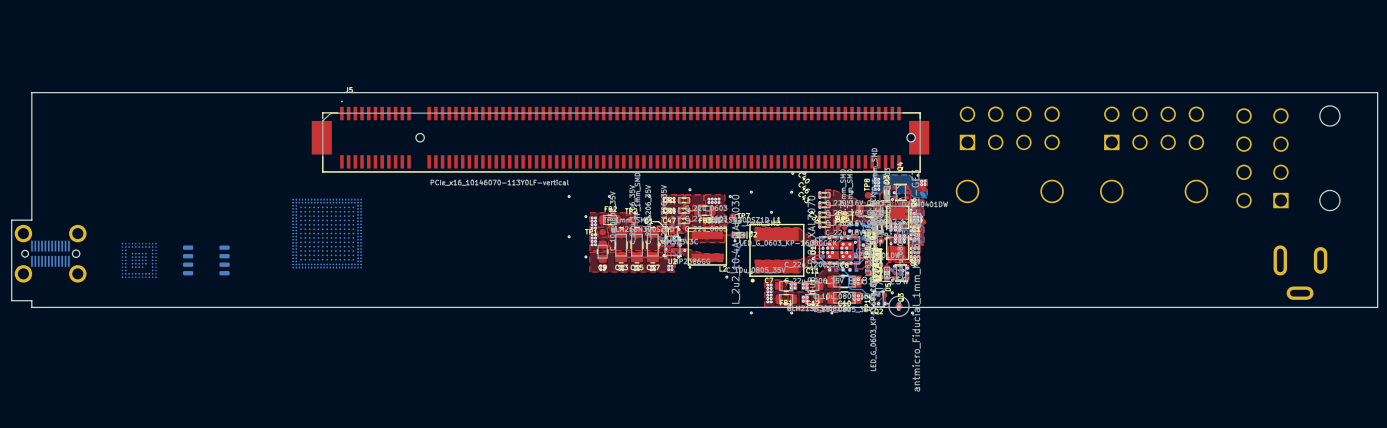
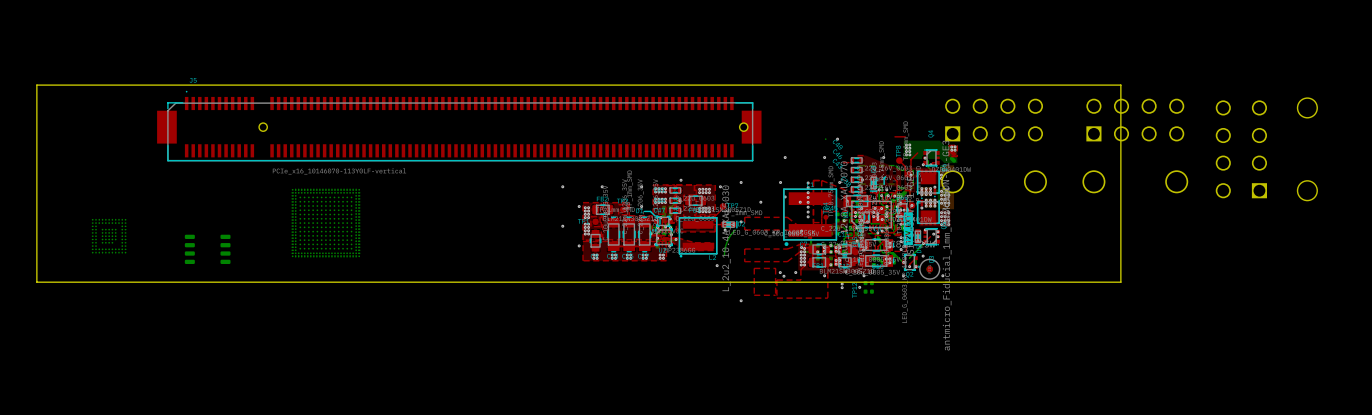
board edge: (1139, 92) (1377, 92) (1377, 307) (31, 307) (31, 300) (11, 300) (11, 220) (31, 220) -> (1120, 85) (1120, 282) (36, 282) (36, 209)
part position: (620, 136) -> (459, 126)
via: none -> (837, 139)
via: none -> (906, 144)
via: none -> (909, 144)
via: none -> (951, 146)
via: none -> (955, 146)
via: none -> (906, 148)
via: none -> (909, 148)
via: none -> (951, 150)
via: none -> (955, 150)
via: none -> (906, 151)
via: none -> (909, 151)
via: none -> (906, 154)
via: none -> (909, 154)
top zone outline: none -> (857, 155) (865, 155)
via: none -> (785, 157)
via: none -> (824, 157)
via: none -> (883, 157)
via: none -> (925, 158)
top track: (863, 170) (874, 170) -> (894, 136) (905, 136)
via: none -> (852, 162)
via: (792, 173) -> none
via: (804, 173) -> none
via: none -> (923, 164)
via: none -> (930, 164)
via: (918, 175) -> none
via: (875, 179) -> none
via: (878, 179) -> none
top zone outline: (918, 179) (918, 191) (927, 191) (927, 179) (918, 179) -> (948, 145) (948, 156) (957, 156) (957, 145) (948, 145)
via: (921, 181) -> none
via: (924, 181) -> none
via: (875, 182) -> none
via: (878, 182) -> none
via: (921, 184) -> none
via: none -> (941, 175)
via: (875, 186) -> none
via: (878, 186) -> none
top track: (921, 186) (923, 188) -> (951, 151) (954, 154)
top track: (886, 187) (879, 194) (879, 211) (874, 210) (874, 201) (868, 195) -> (917, 152) (910, 159) (910, 176) (905, 175) (905, 166) (899, 160)
via: none -> (941, 178)
via: (878, 189) -> none
bottom track: (894, 192) (897, 195) (897, 202) (900, 204) -> (925, 158) (930, 169)
via: (894, 192) -> none
part position: (900, 192) -> (931, 157)
bottom track: (921, 193) (923, 195) -> (951, 158) (954, 160)
part position: (824, 195) -> (856, 160)
part position: (868, 195) -> (899, 160)
via: none -> (934, 187)
top track: (907, 197) (900, 199) -> (937, 162) (930, 164)
via: none -> (921, 188)
via: none -> (926, 188)
via: none -> (930, 188)
via: none -> (921, 191)
via: none -> (926, 191)
via: none -> (930, 191)
via: none -> (941, 191)
part position: (824, 204) -> (856, 170)
via: none -> (921, 194)
via: none -> (926, 194)
via: none -> (930, 194)
via: none -> (881, 195)
via: none -> (888, 195)
via: none -> (941, 195)
via: none -> (945, 195)
via: none -> (948, 195)
via: none -> (785, 196)
via: none -> (894, 196)
via: none -> (941, 199)
via: none -> (945, 199)
via: (910, 210) -> none
via: none -> (926, 200)
via: none -> (930, 200)
via: none -> (934, 200)
line: (853, 211) (852, 219) -> (885, 176) (884, 184)
via: (910, 213) -> none
via: none -> (926, 203)
via: none -> (930, 203)
via: none -> (934, 203)
via: none -> (941, 203)
via: none -> (945, 203)
via: none -> (948, 203)
part position: (824, 214) -> (856, 179)
via: none -> (911, 205)
via: none -> (887, 206)
via: (914, 216) -> none
via: (917, 216) -> none
via: (921, 216) -> none
via: none -> (926, 206)
via: none -> (930, 206)
via: none -> (934, 206)
via: none -> (861, 208)
via: none -> (874, 208)
via: none -> (881, 208)
via: none -> (921, 207)
part position: (897, 219) -> (928, 184)
via: none -> (855, 212)
via: none -> (873, 212)
via: (904, 222) -> none
via: (895, 223) -> none
via: none -> (941, 212)
via: none -> (945, 212)
via: none -> (948, 212)
part position: (824, 224) -> (856, 189)
via: (849, 224) -> none
via: (856, 224) -> none
via: none -> (855, 216)
via: (895, 226) -> none
top track: (844, 227) (844, 237) -> (876, 192) (876, 202)
part position: (844, 227) -> (876, 192)
via: none -> (859, 216)
via: none -> (873, 216)
via: none -> (941, 216)
via: none -> (945, 216)
via: (899, 229) -> none
via: (911, 230) -> none
via: (914, 230) -> none
top track: (849, 231) (851, 237) -> (881, 195) (883, 202)
via: (849, 231) -> none
top track: (856, 231) (854, 237) -> (888, 195) (886, 202)
via: (863, 231) -> none
via: none -> (861, 220)
via: none -> (941, 220)
via: none -> (945, 220)
via: none -> (948, 220)
via: (911, 234) -> none
via: (895, 235) -> none
via: (899, 235) -> none
via: (904, 235) -> none
via: none -> (941, 224)
via: none -> (948, 224)
via: (829, 237) -> none
via: (841, 237) -> none
via: (848, 237) -> none
via: (895, 238) -> none
via: (904, 238) -> none
via: (911, 238) -> none
via: (914, 238) -> none
via: none -> (925, 229)
part position: (880, 241) -> (911, 205)
via: (880, 241) -> none
via: (899, 241) -> none
via: (904, 241) -> none
bottom track: (855, 242) (853, 244) (852, 259) (839, 259) (836, 256) -> (887, 206) (884, 208) (883, 223) (871, 223) (868, 220)
via: (855, 242) -> none
via: none -> (937, 231)
via: (829, 244) -> none
via: (843, 244) -> none
via: (849, 244) -> none
via: none -> (933, 234)
via: (863, 245) -> none
part position: (897, 246) -> (928, 210)
top track: none -> (930, 236) (923, 243)
via: none -> (937, 236)
via: (823, 248) -> none
via: (827, 248) -> none
via: (832, 248) -> none
via: (841, 248) -> none
via: (846, 248) -> none
via: (911, 248) -> none
via: none -> (874, 239)
part position: (839, 251) -> (871, 215)
via: (823, 252) -> none
via: (827, 252) -> none
via: (832, 252) -> none
via: (841, 252) -> none
via: (846, 252) -> none
via: (911, 252) -> none
via: none -> (917, 241)
part: (50, 253) -> none
part position: (776, 253) -> (810, 217)
via: none -> (889, 243)
via: none -> (923, 243)
via: (829, 256) -> none
via: (849, 256) -> none
via: (911, 256) -> none
via: (914, 256) -> none
via: none -> (889, 246)
via: none -> (824, 247)
via: none -> (836, 247)
via: none -> (839, 247)
via: none -> (804, 248)
part position: (139, 260) -> (109, 236)
via: (911, 260) -> none
via: (918, 260) -> none
via: none -> (801, 251)
via: none -> (804, 251)
via: none -> (824, 251)
via: none -> (836, 251)
top track: (837, 263) (837, 266) (843, 269) -> (869, 227) (869, 230) (874, 233)
top track: (854, 263) (856, 268) (862, 268) (868, 263) -> (886, 227) (888, 232) (893, 232) (899, 227)
drawing position: (877, 264) -> (908, 228)
via: none -> (801, 255)
via: none -> (804, 255)
via: (894, 266) -> none
via: none -> (923, 256)
via: (907, 268) -> none
via: none -> (801, 258)
via: none -> (804, 258)
via: (829, 269) -> none
bottom track: (836, 269) (843, 269) (848, 275) (848, 286) (851, 289) (861, 289) (872, 299) -> (868, 233) (874, 233) (880, 239) (880, 250) (883, 252) (893, 252) (903, 262)
via: (843, 269) -> none
via: (849, 269) -> none
part: (853, 269) -> none
via: none -> (886, 259)
via: none -> (836, 260)
via: none -> (839, 260)
via: (751, 272) -> none
part: (1300, 272) -> none
via: none -> (801, 261)
via: none -> (804, 261)
part position: (886, 273) -> (917, 237)
part position: (901, 273) -> (931, 236)
via: (907, 273) -> none
via: none -> (903, 262)
via: none -> (889, 262)
via: none -> (836, 264)
via: none -> (839, 264)
via: none -> (801, 264)
via: none -> (804, 264)
via: (886, 277) -> none
via: none -> (909, 266)
via: none -> (915, 266)
via: (854, 279) -> none
via: (858, 279) -> none
bottom track: (892, 280) (878, 294) -> (923, 243) (909, 258)
via: (892, 280) -> none
part position: (844, 281) -> (876, 245)
via: (854, 283) -> none
via: (795, 284) -> none
via: (803, 284) -> none
via: (767, 285) -> none
via: (771, 285) -> none
part position: (786, 286) -> (819, 249)
part position: (812, 286) -> (844, 249)
via: (791, 287) -> none
via: (803, 287) -> none
via: (807, 287) -> none
via: none -> (824, 275)
via: none -> (864, 275)
via: none -> (903, 275)
via: none -> (942, 275)
via: (767, 288) -> none
via: (771, 288) -> none
via: (767, 291) -> none
via: (771, 291) -> none
via: (892, 292) -> none
top track: (884, 294) (878, 303) -> (915, 258) (909, 266)
bottom track: (885, 294) (885, 303) -> (915, 258) (915, 266)
via: (767, 295) -> none
via: (771, 295) -> none
via: (858, 295) -> none
via: (803, 297) -> none
via: (807, 297) -> none
part position: (844, 297) -> (876, 260)
via: (767, 298) -> none
via: (771, 298) -> none
part position: (786, 299) -> (819, 262)
part position: (812, 299) -> (844, 262)
via: (858, 299) -> none
part position: (879, 299) -> (910, 262)
via: (767, 301) -> none
via: (771, 301) -> none
via: (803, 301) -> none
via: (807, 301) -> none
via: (878, 303) -> none
via: (885, 303) -> none
part position: (899, 306) -> (929, 269)
via: (791, 312) -> none
via: (831, 312) -> none
via: (872, 312) -> none
via: (912, 312) -> none

